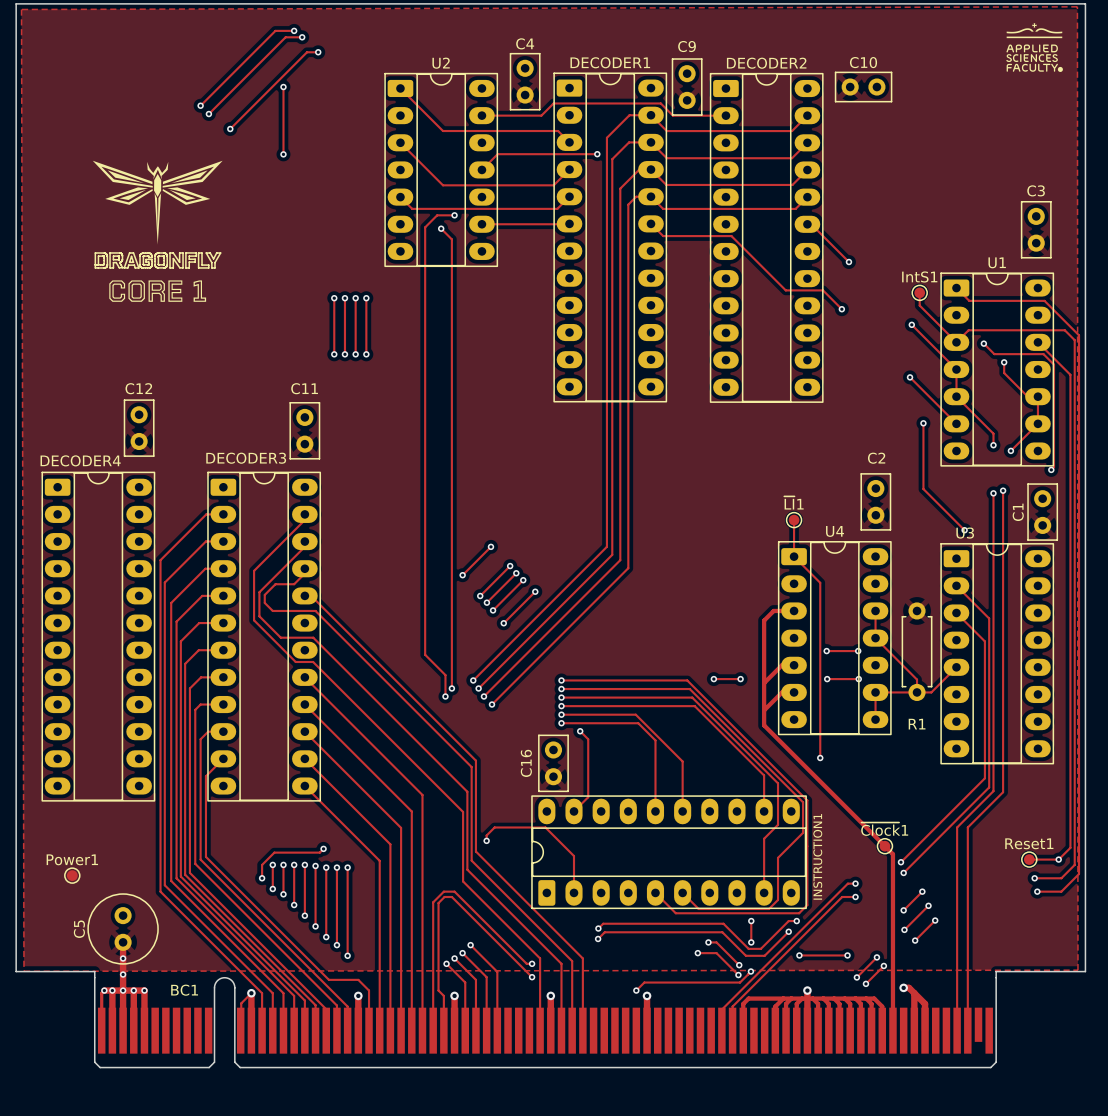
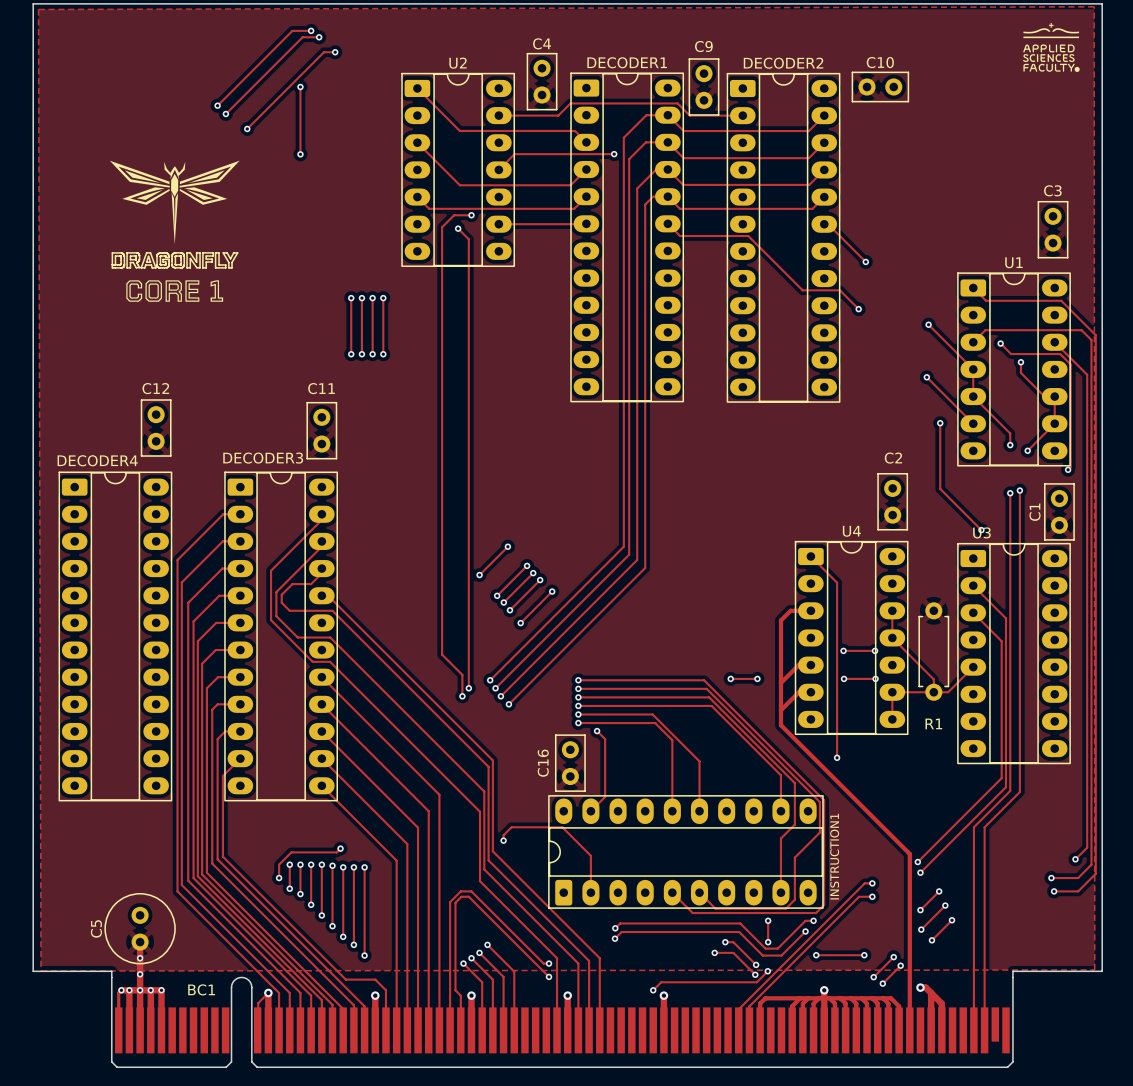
track: (919, 292) (919, 305) (956, 342) -> none
IntS1: (919, 292) -> none
track: (794, 520) (794, 556) -> none
~{LI}1: (794, 520) -> none
~{Clock}1: (884, 846) -> none
track: (1029, 859) (1058, 859) -> none
Reset1: (1029, 859) -> none
Power1: (72, 875) -> none

